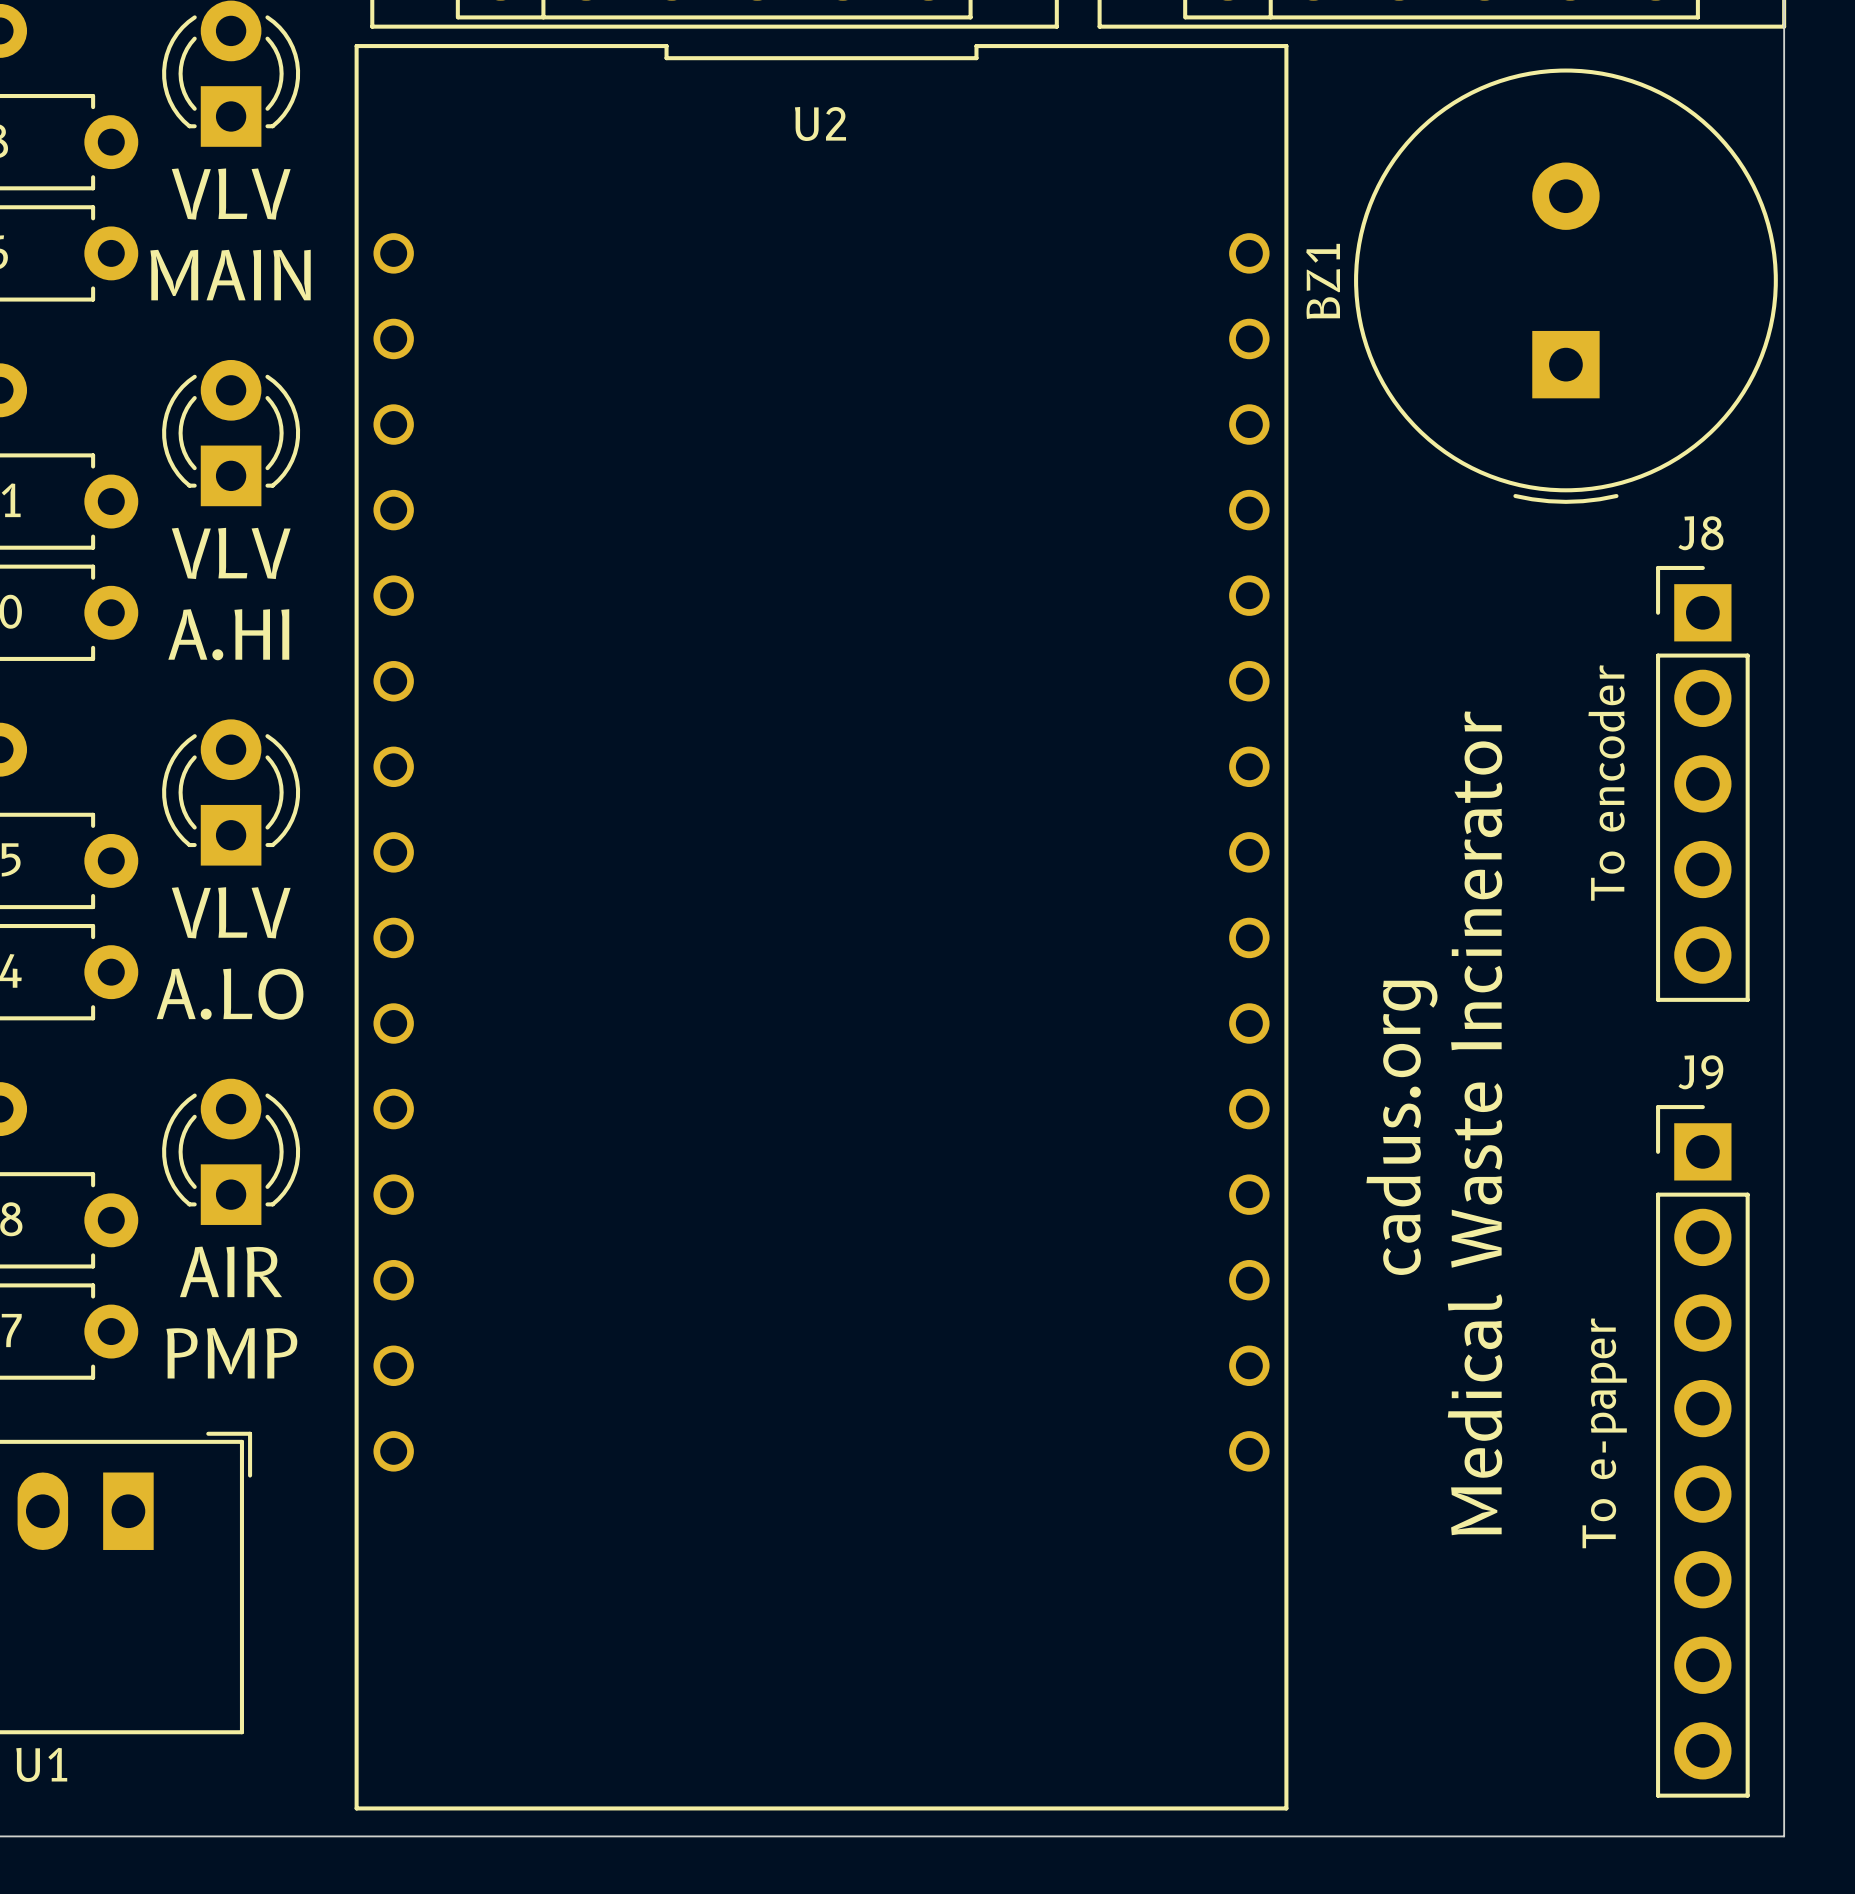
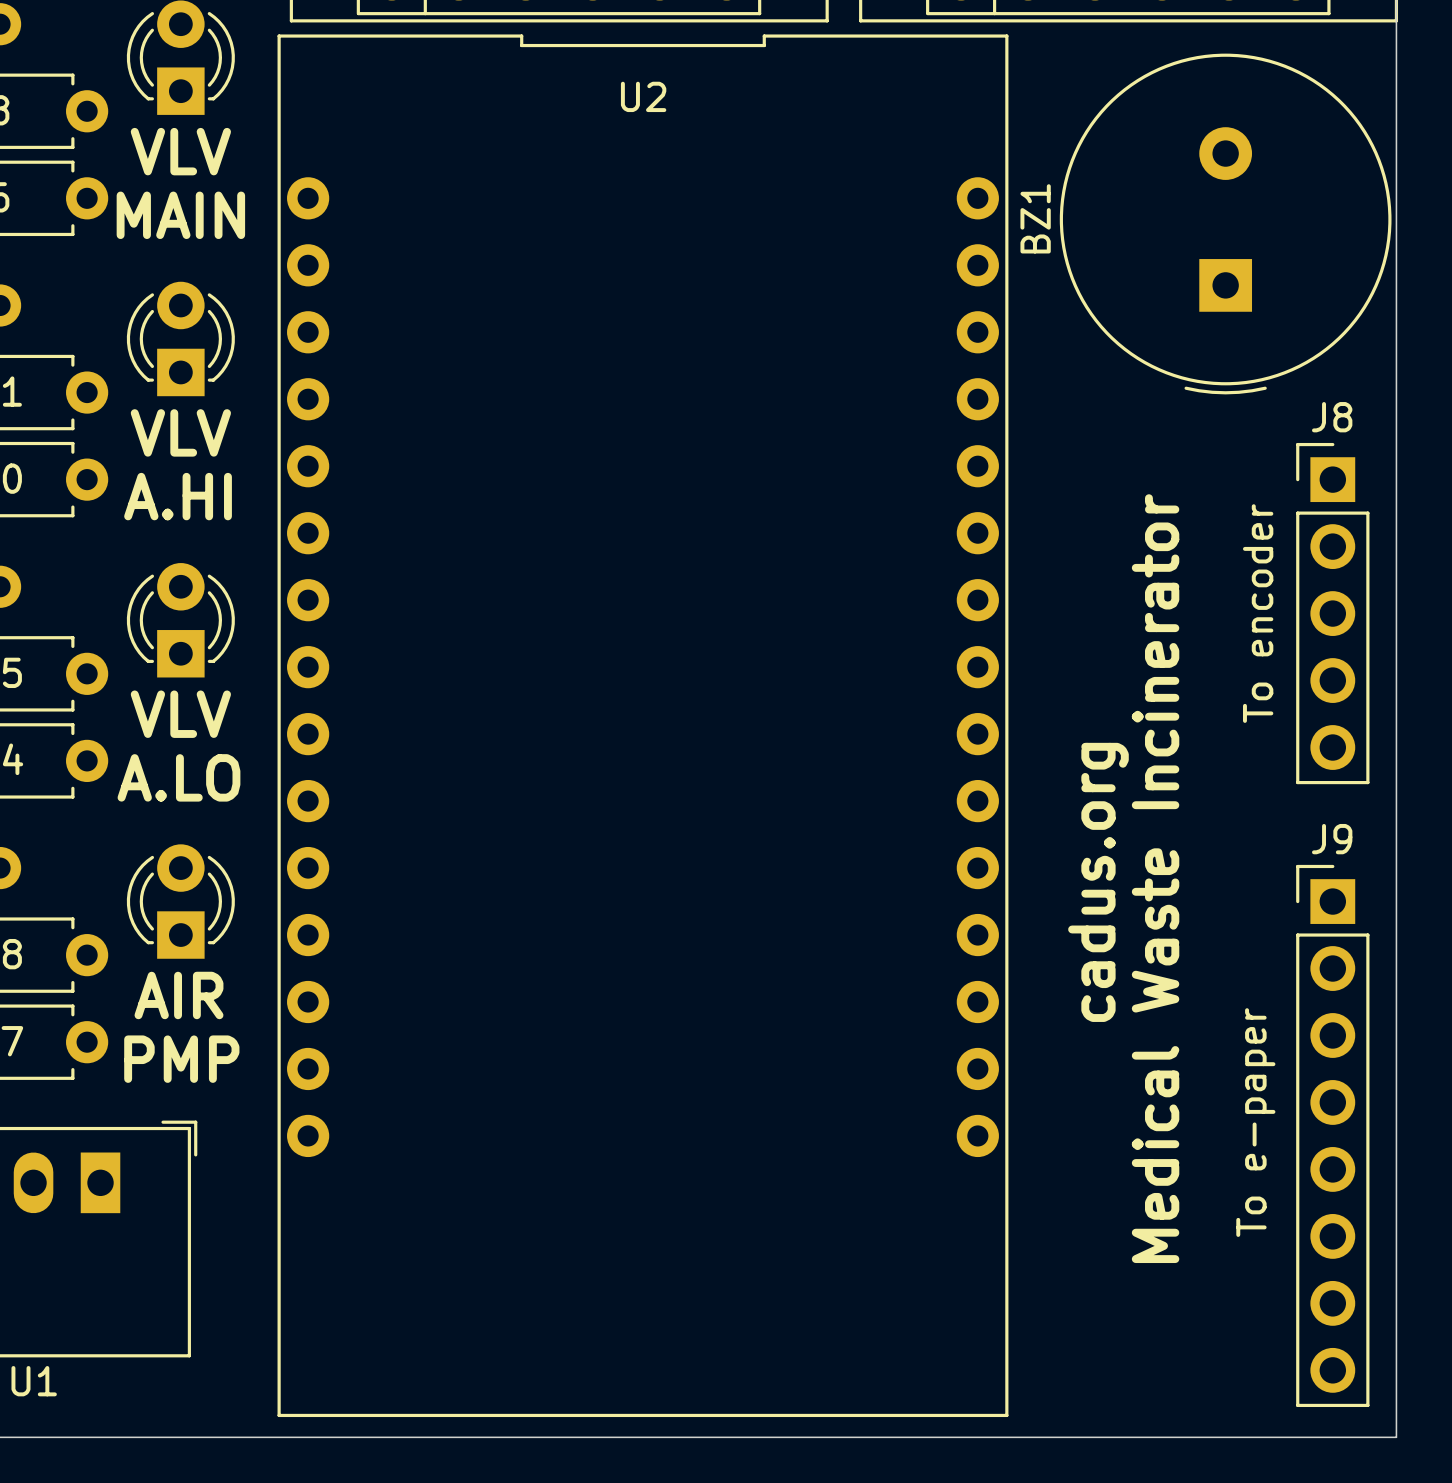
U2 footprint: [354, 44, 1289, 1811] -> [277, 34, 1009, 1418]

